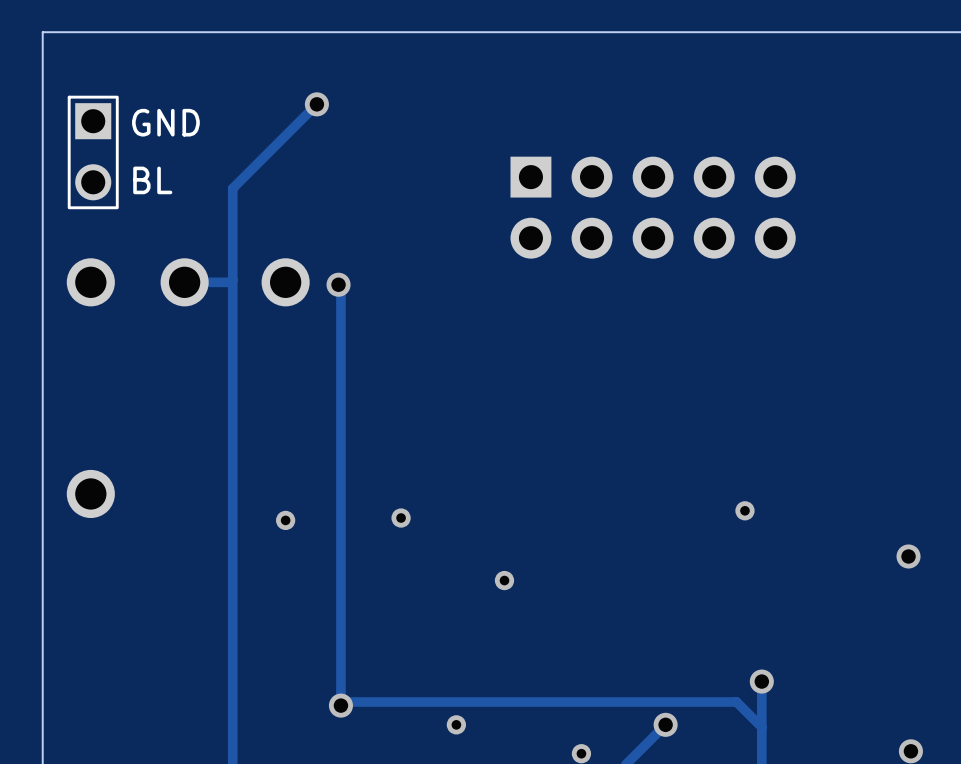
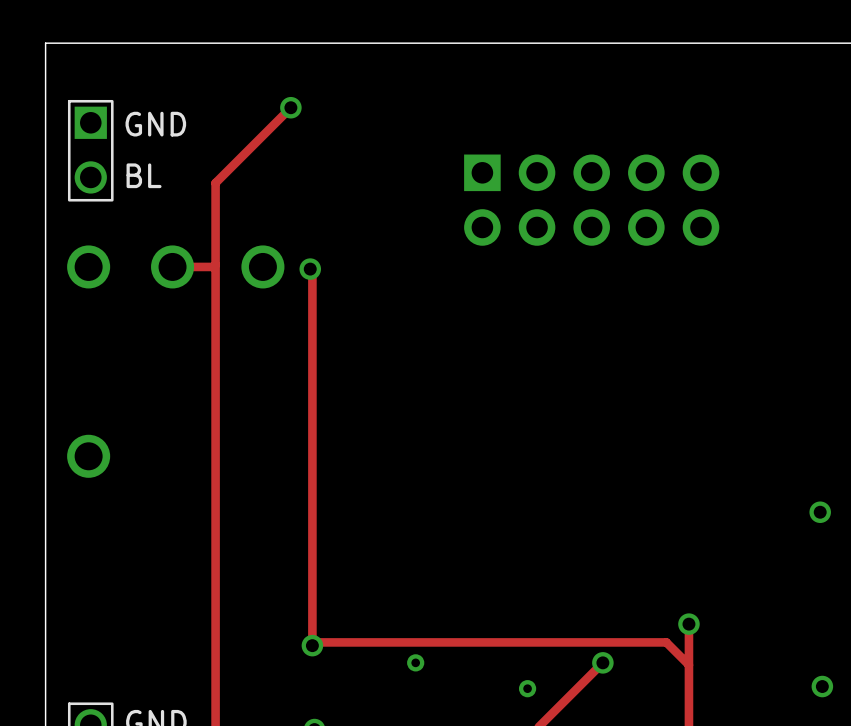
via: (744, 510) -> none
via: (401, 518) -> none
via: (285, 520) -> none
via: (504, 580) -> none

